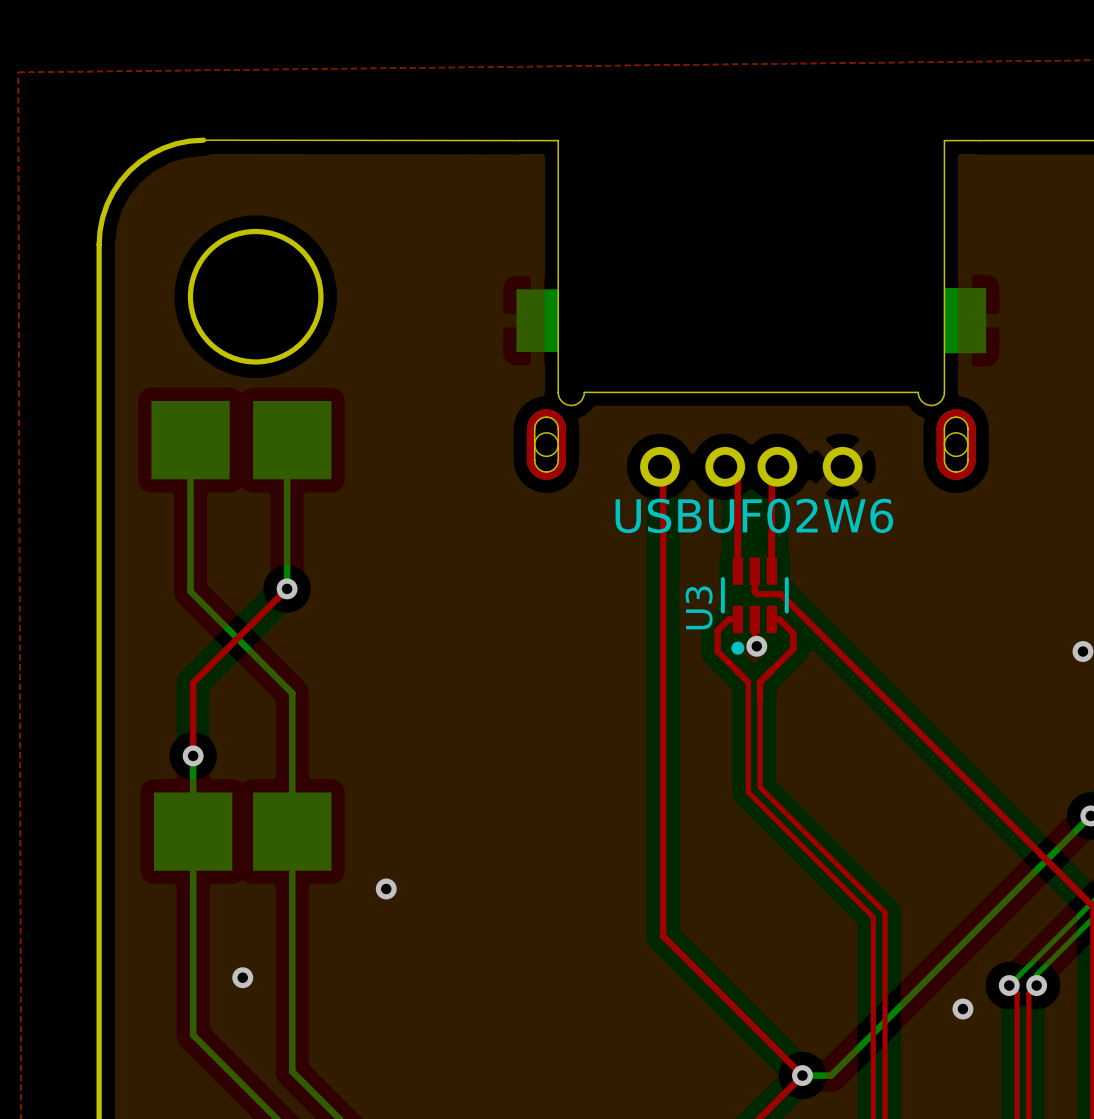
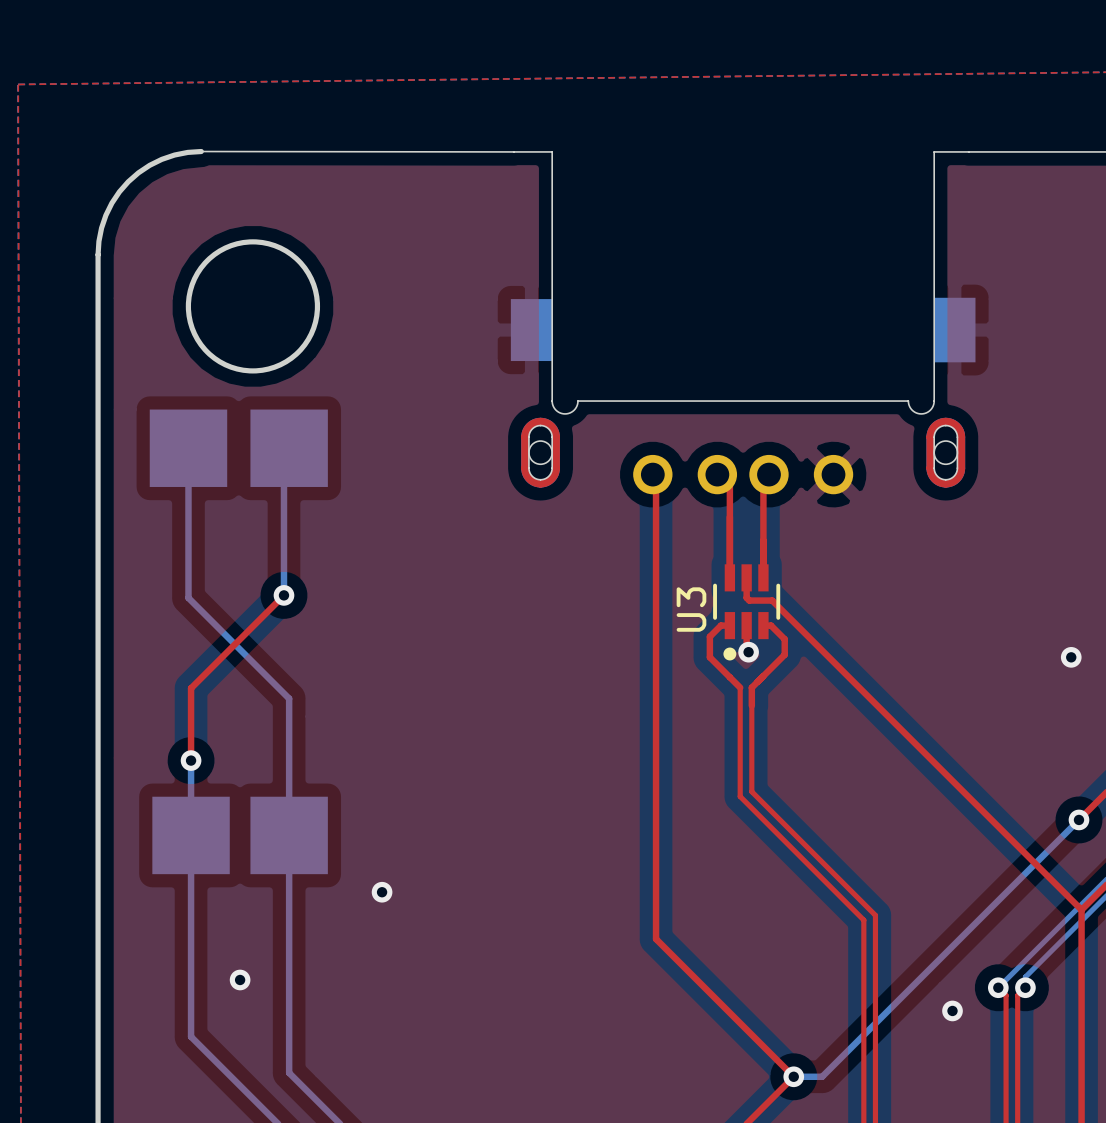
U3 value: USBUF02W6 (754, 515) -> none

